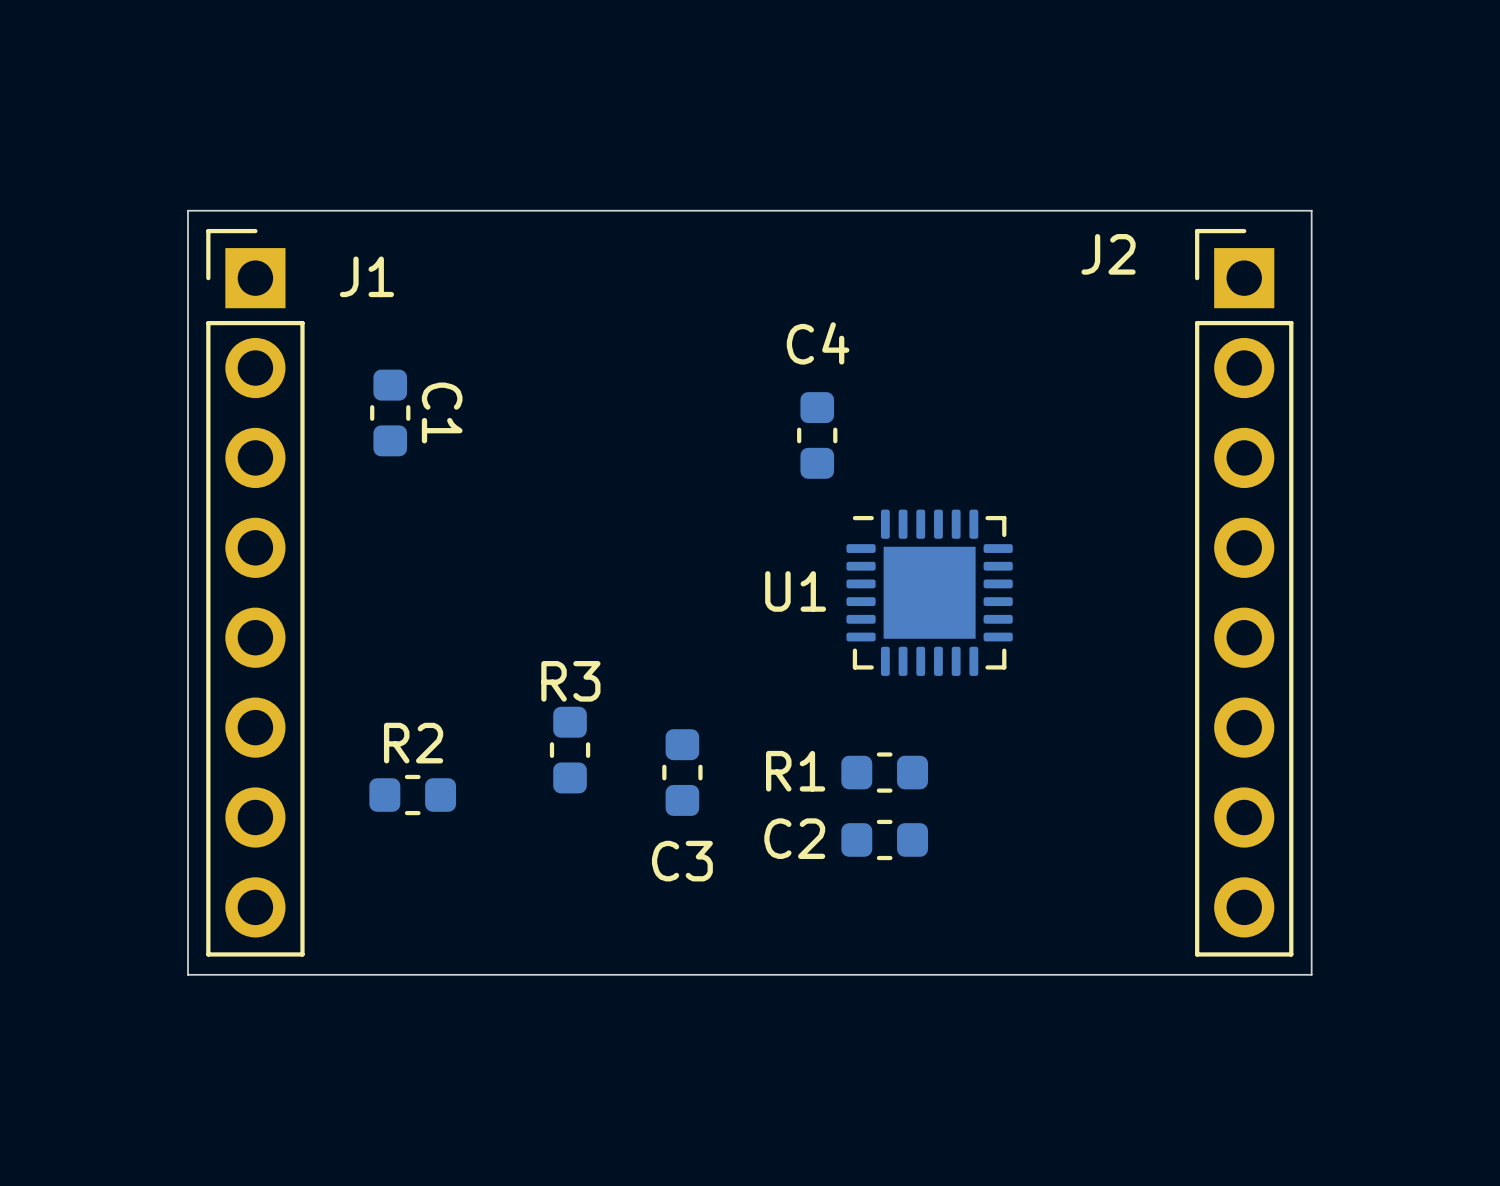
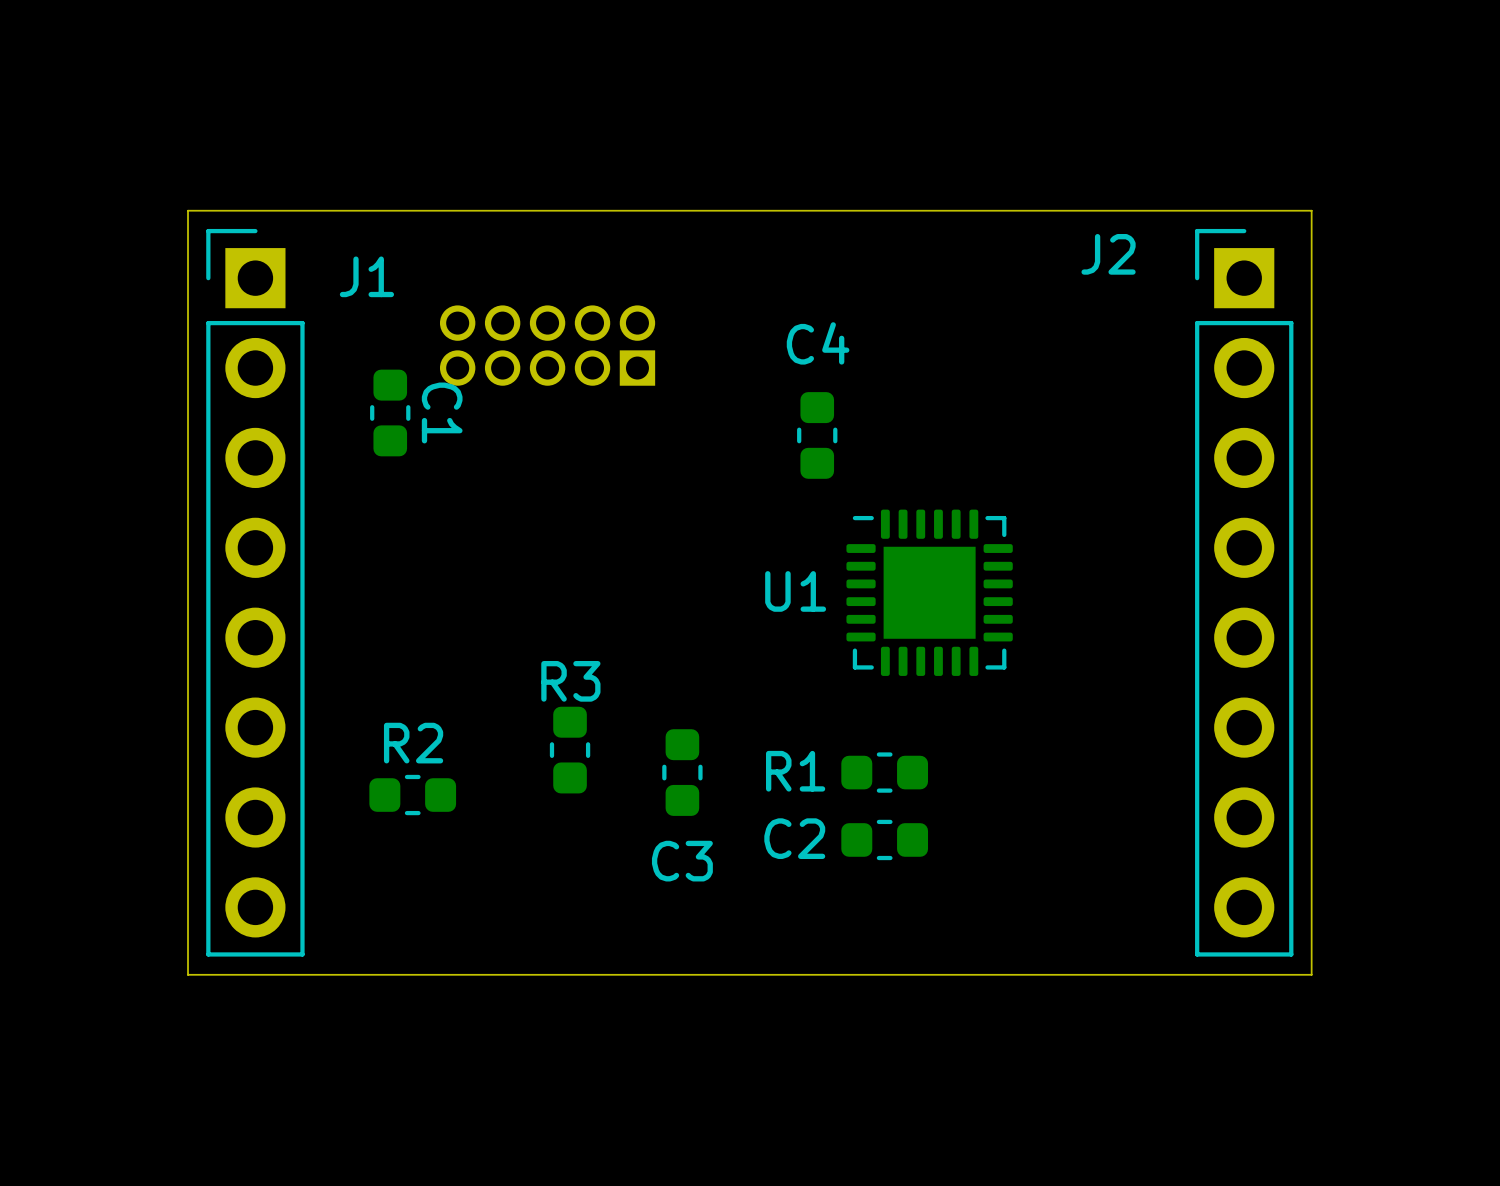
part: none -> (547, 345)

